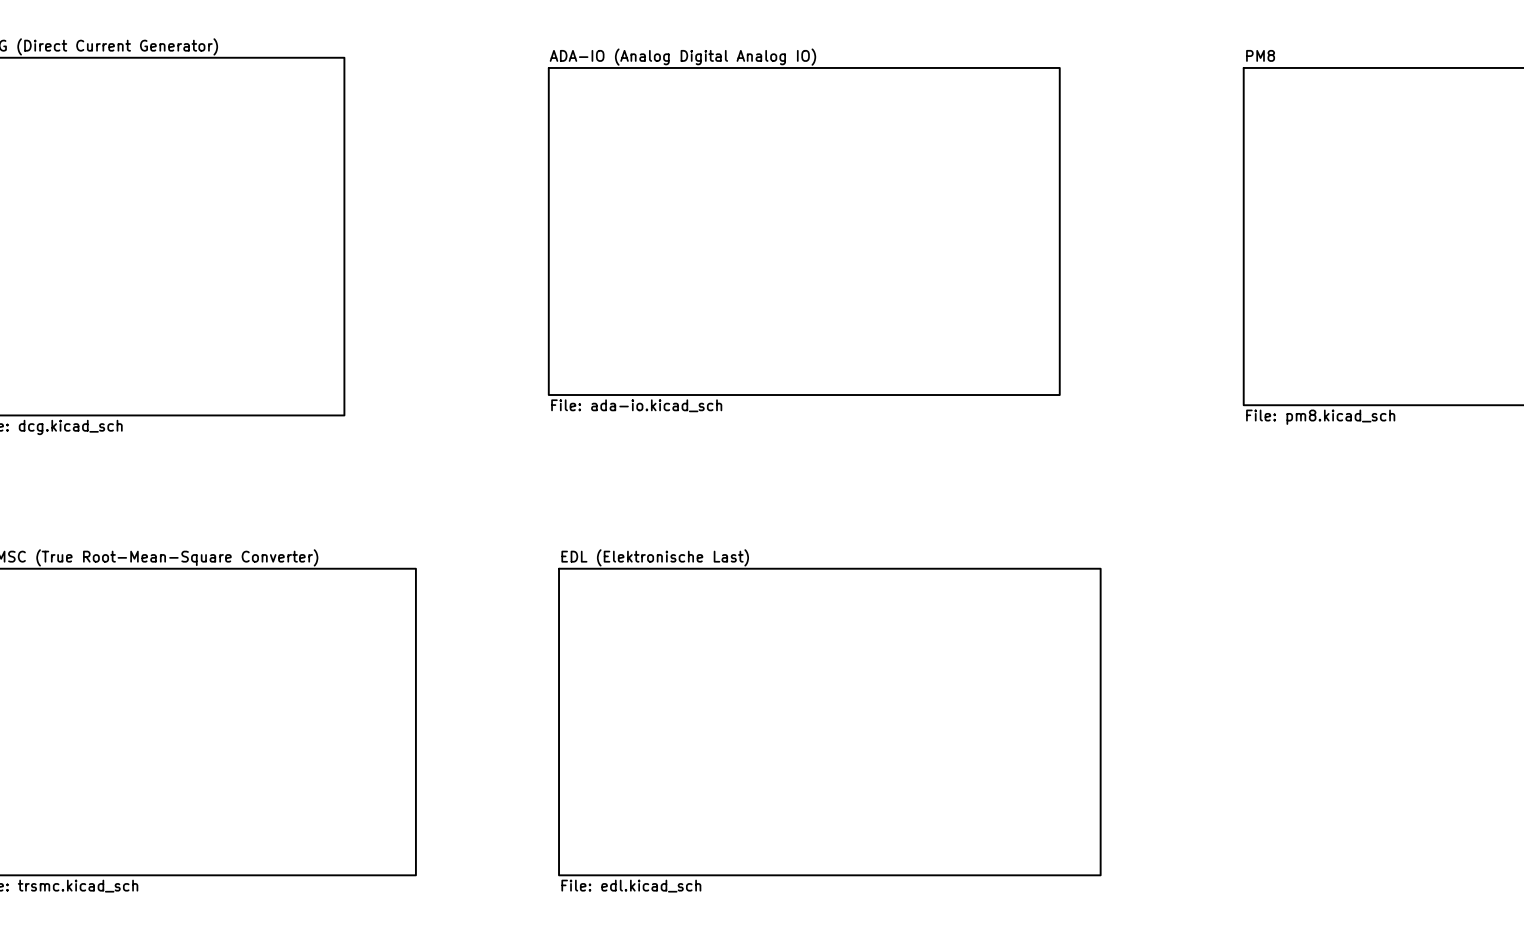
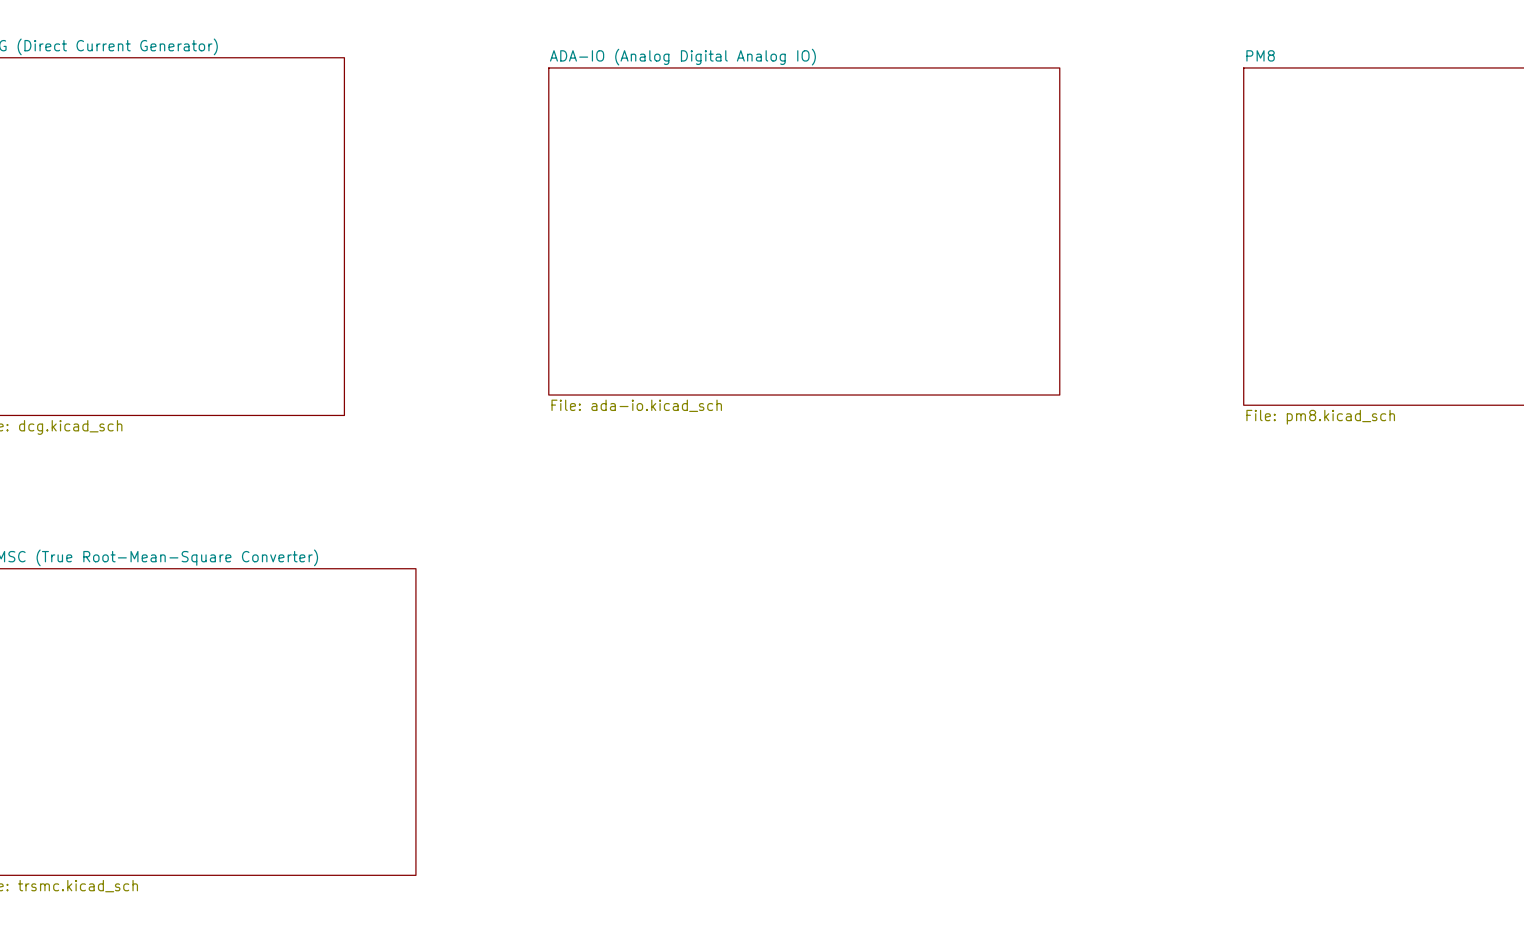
sheet EDL (Elektronische Last): File: edl.kicad_sch (829, 722) -> none

